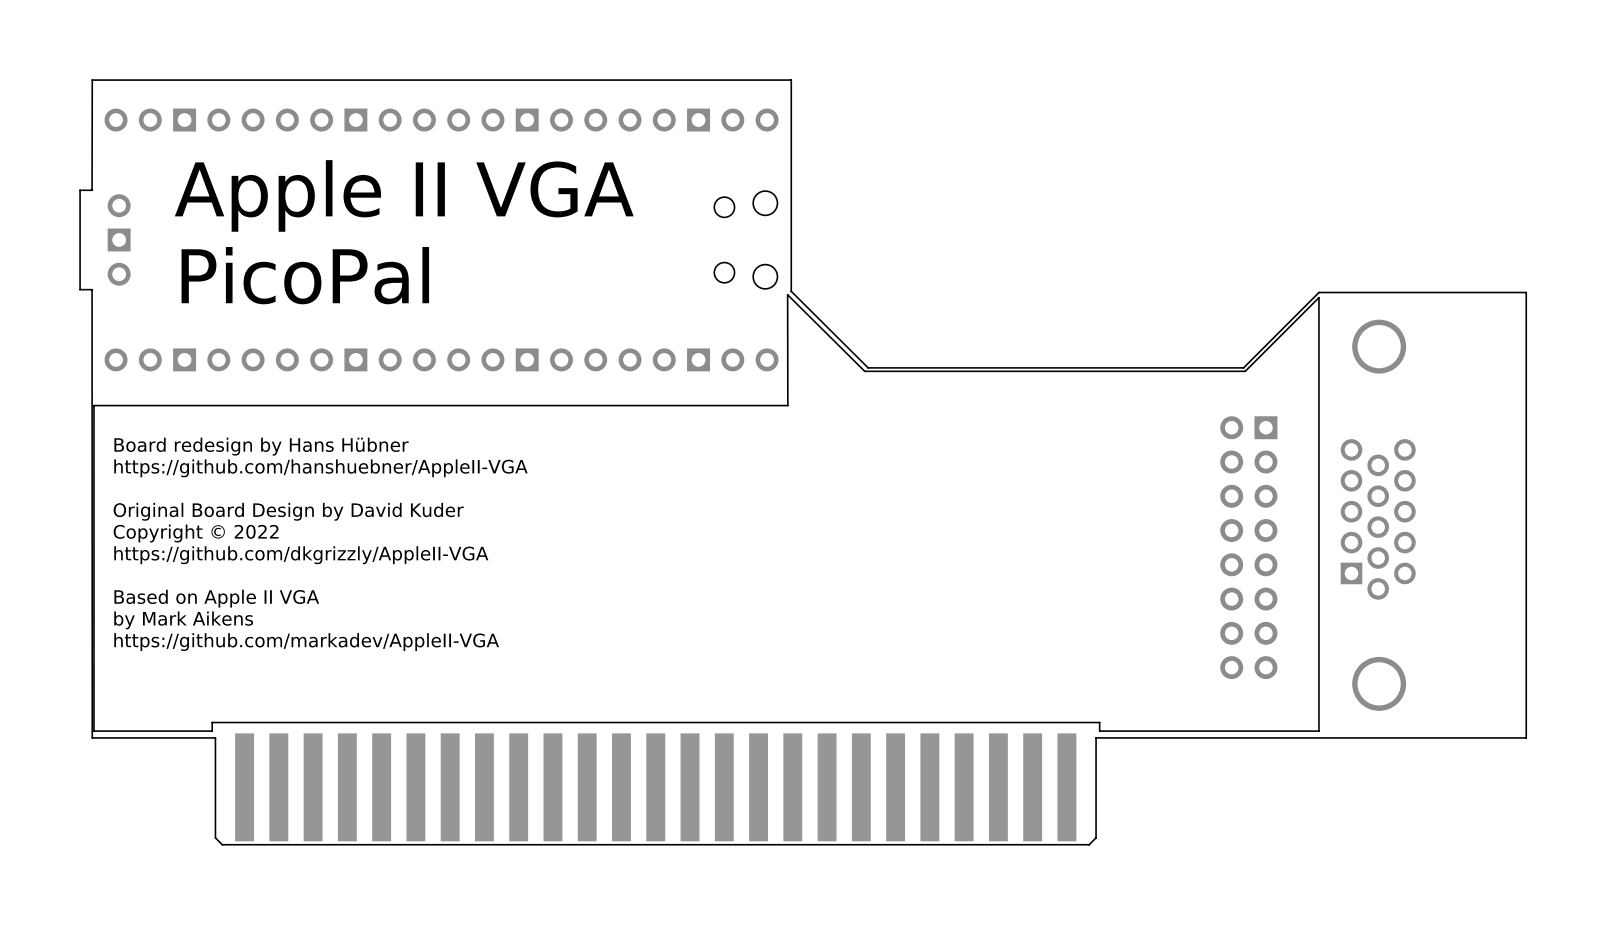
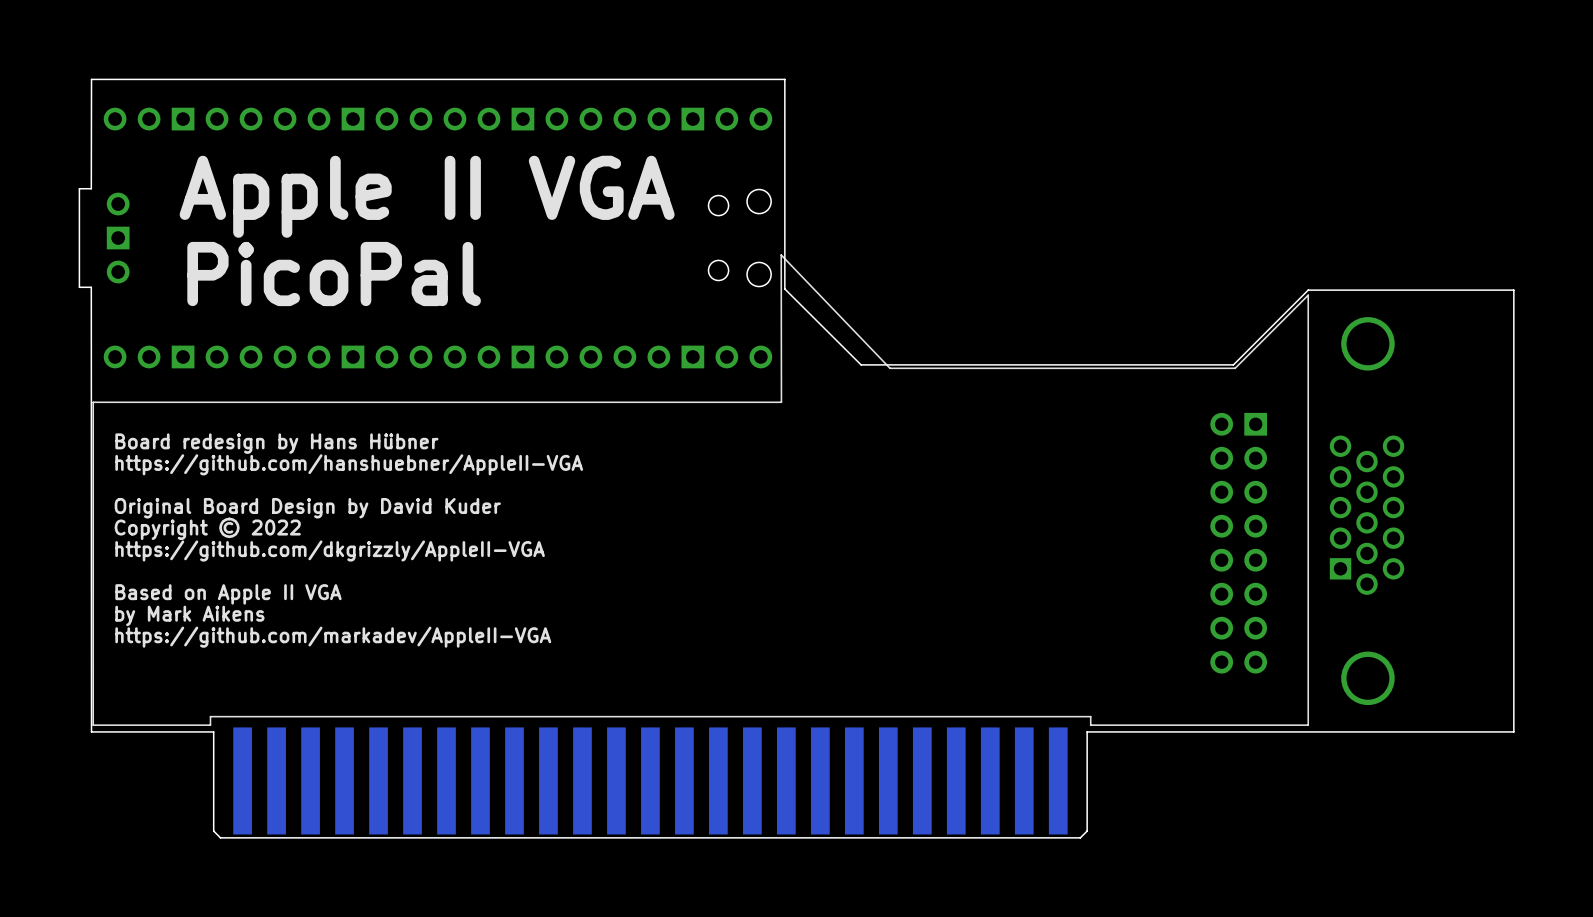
line: (897, 371) (864, 371) (787, 294) (787, 405) -> (889, 368) (781, 255) (781, 402)

